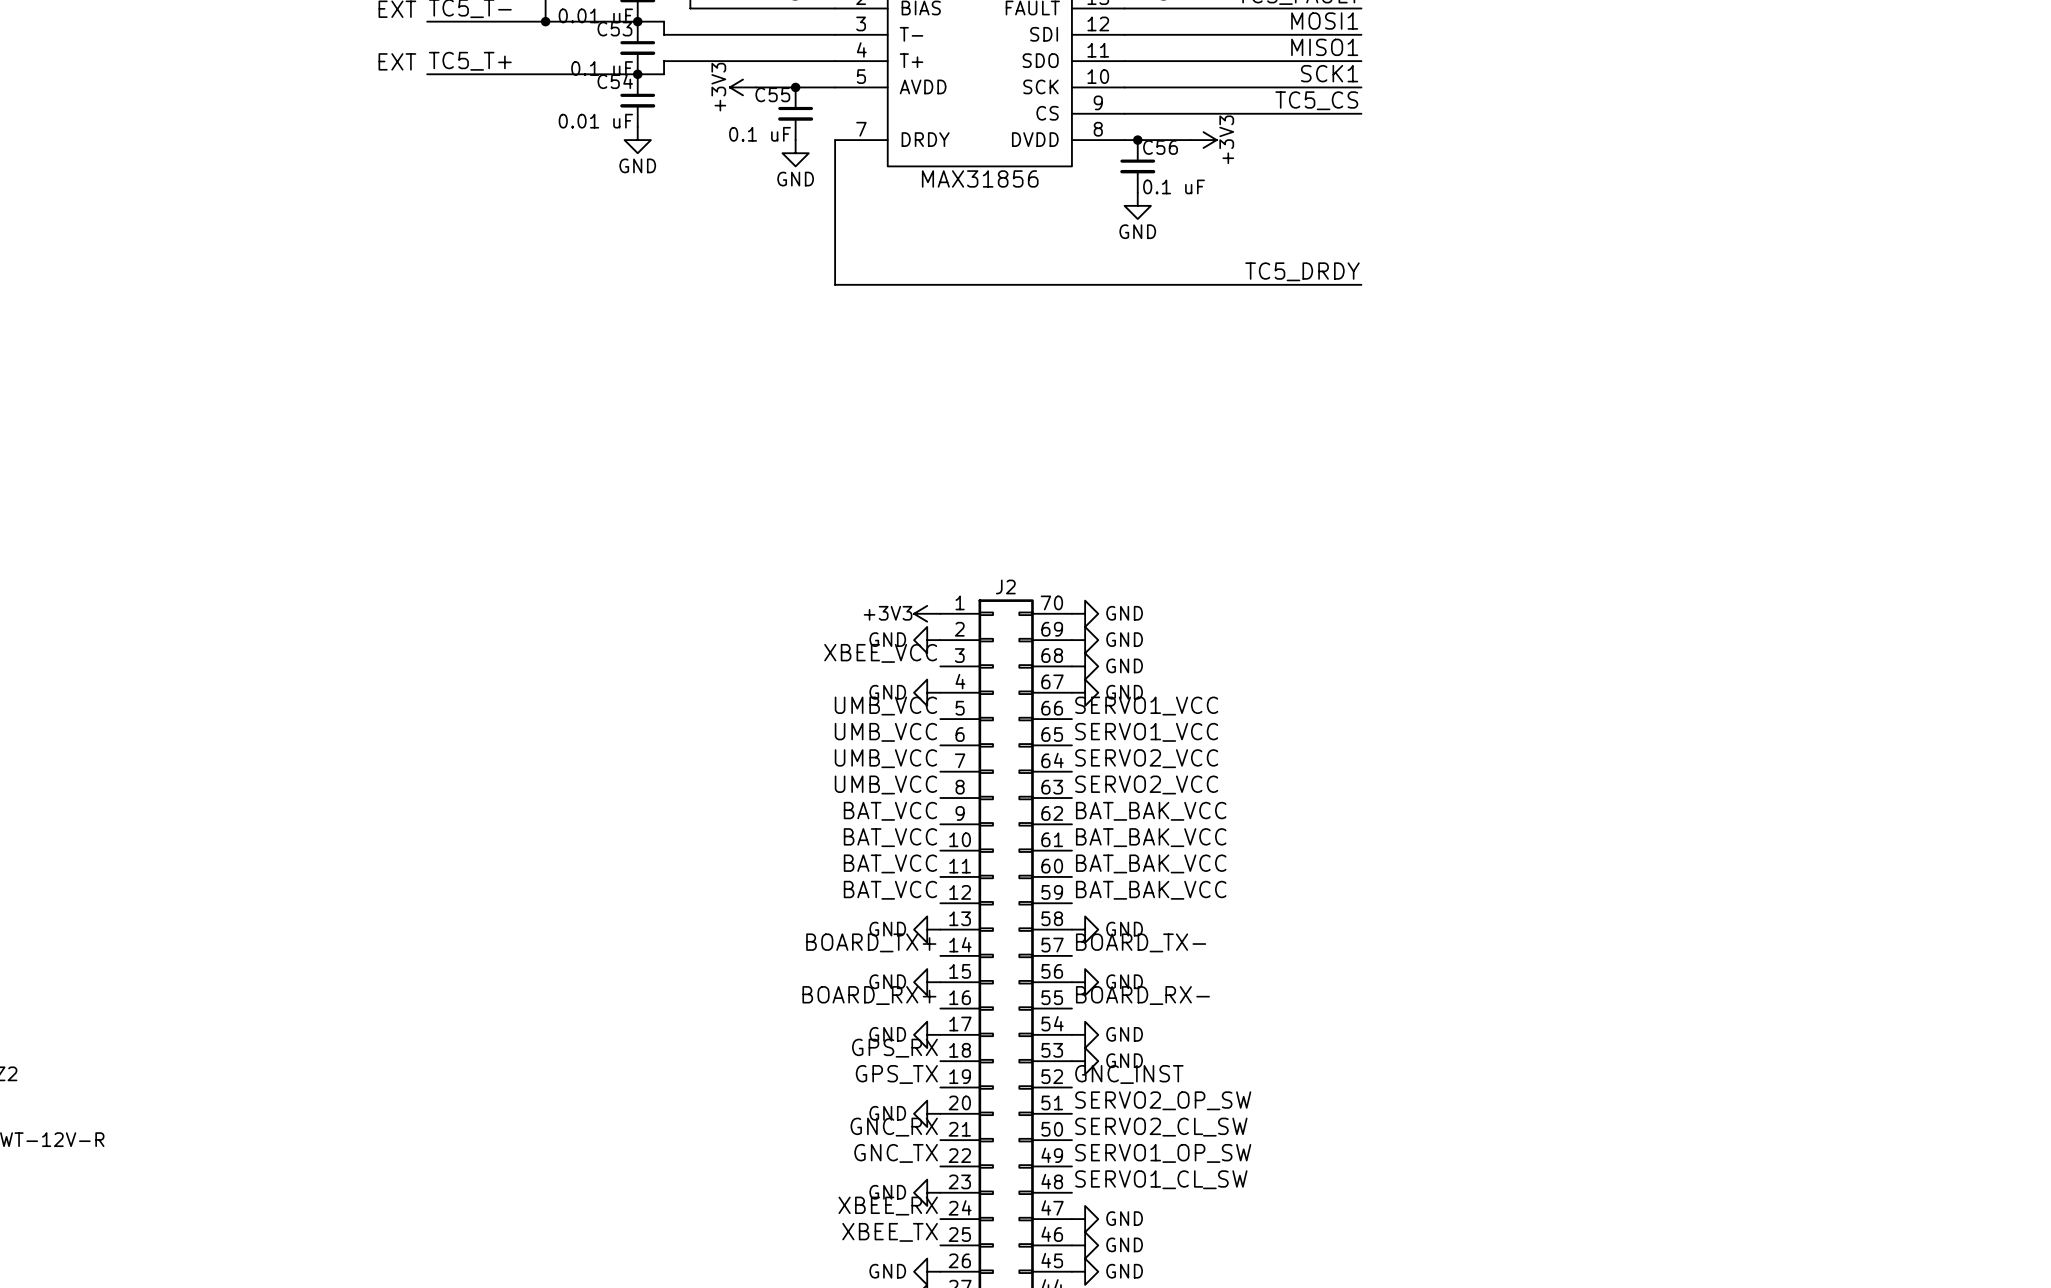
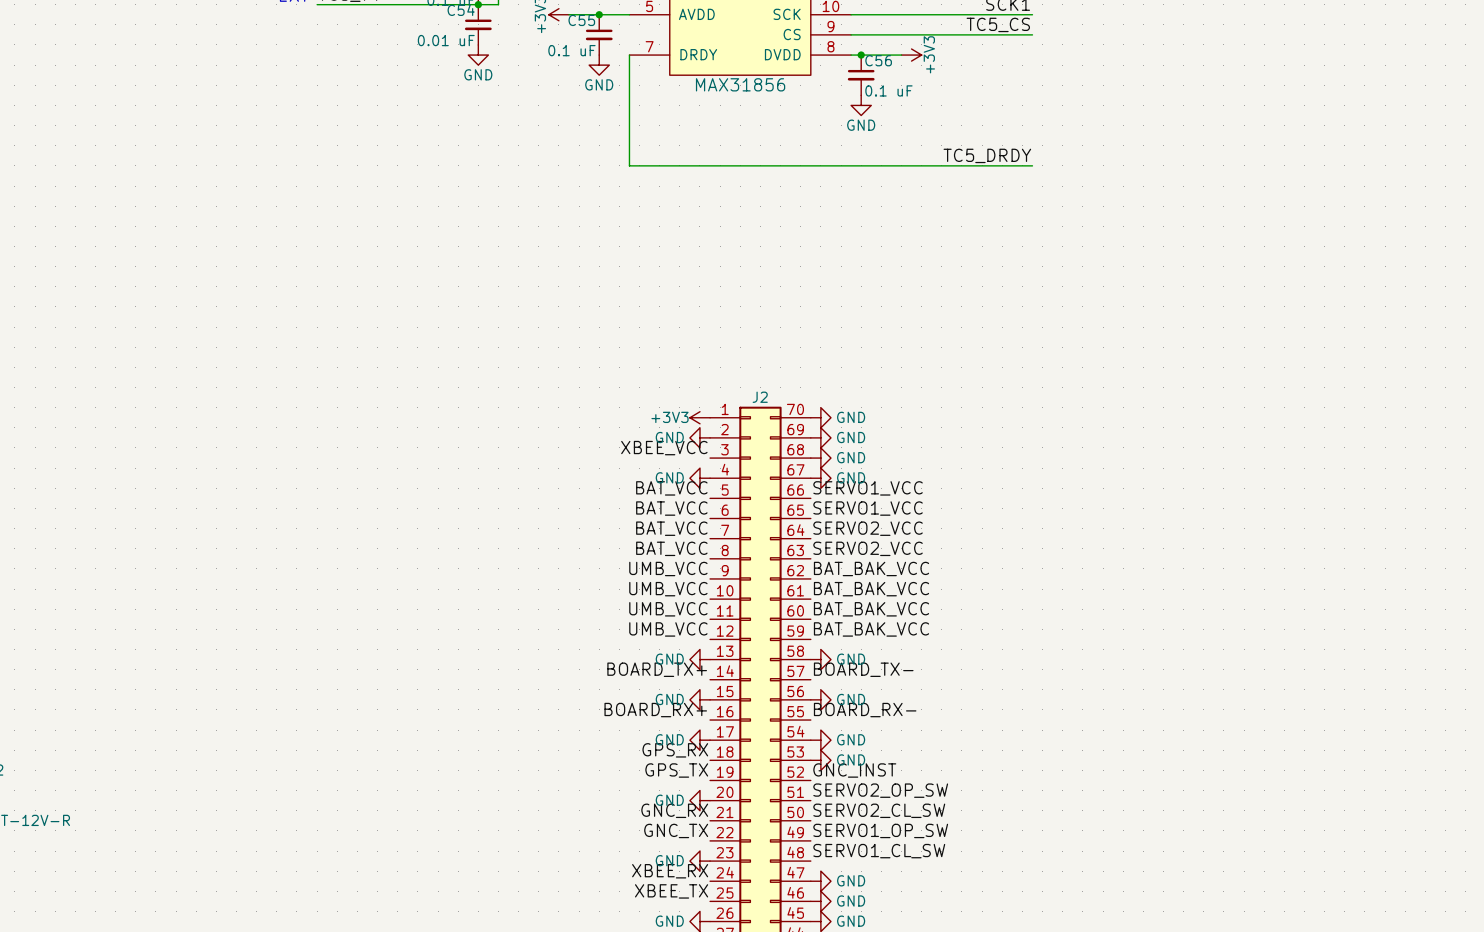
label: UMB_VCC (885, 706) -> BAT_VCC (671, 488)
label: UMB_VCC (885, 732) -> BAT_VCC (671, 508)
label: UMB_VCC (885, 758) -> BAT_VCC (671, 528)
label: UMB_VCC (885, 784) -> BAT_VCC (671, 548)
label: BAT_VCC (890, 811) -> UMB_VCC (668, 568)
label: BAT_VCC (890, 837) -> UMB_VCC (668, 589)
label: BAT_VCC (890, 863) -> UMB_VCC (668, 609)
label: BAT_VCC (890, 890) -> UMB_VCC (668, 629)

